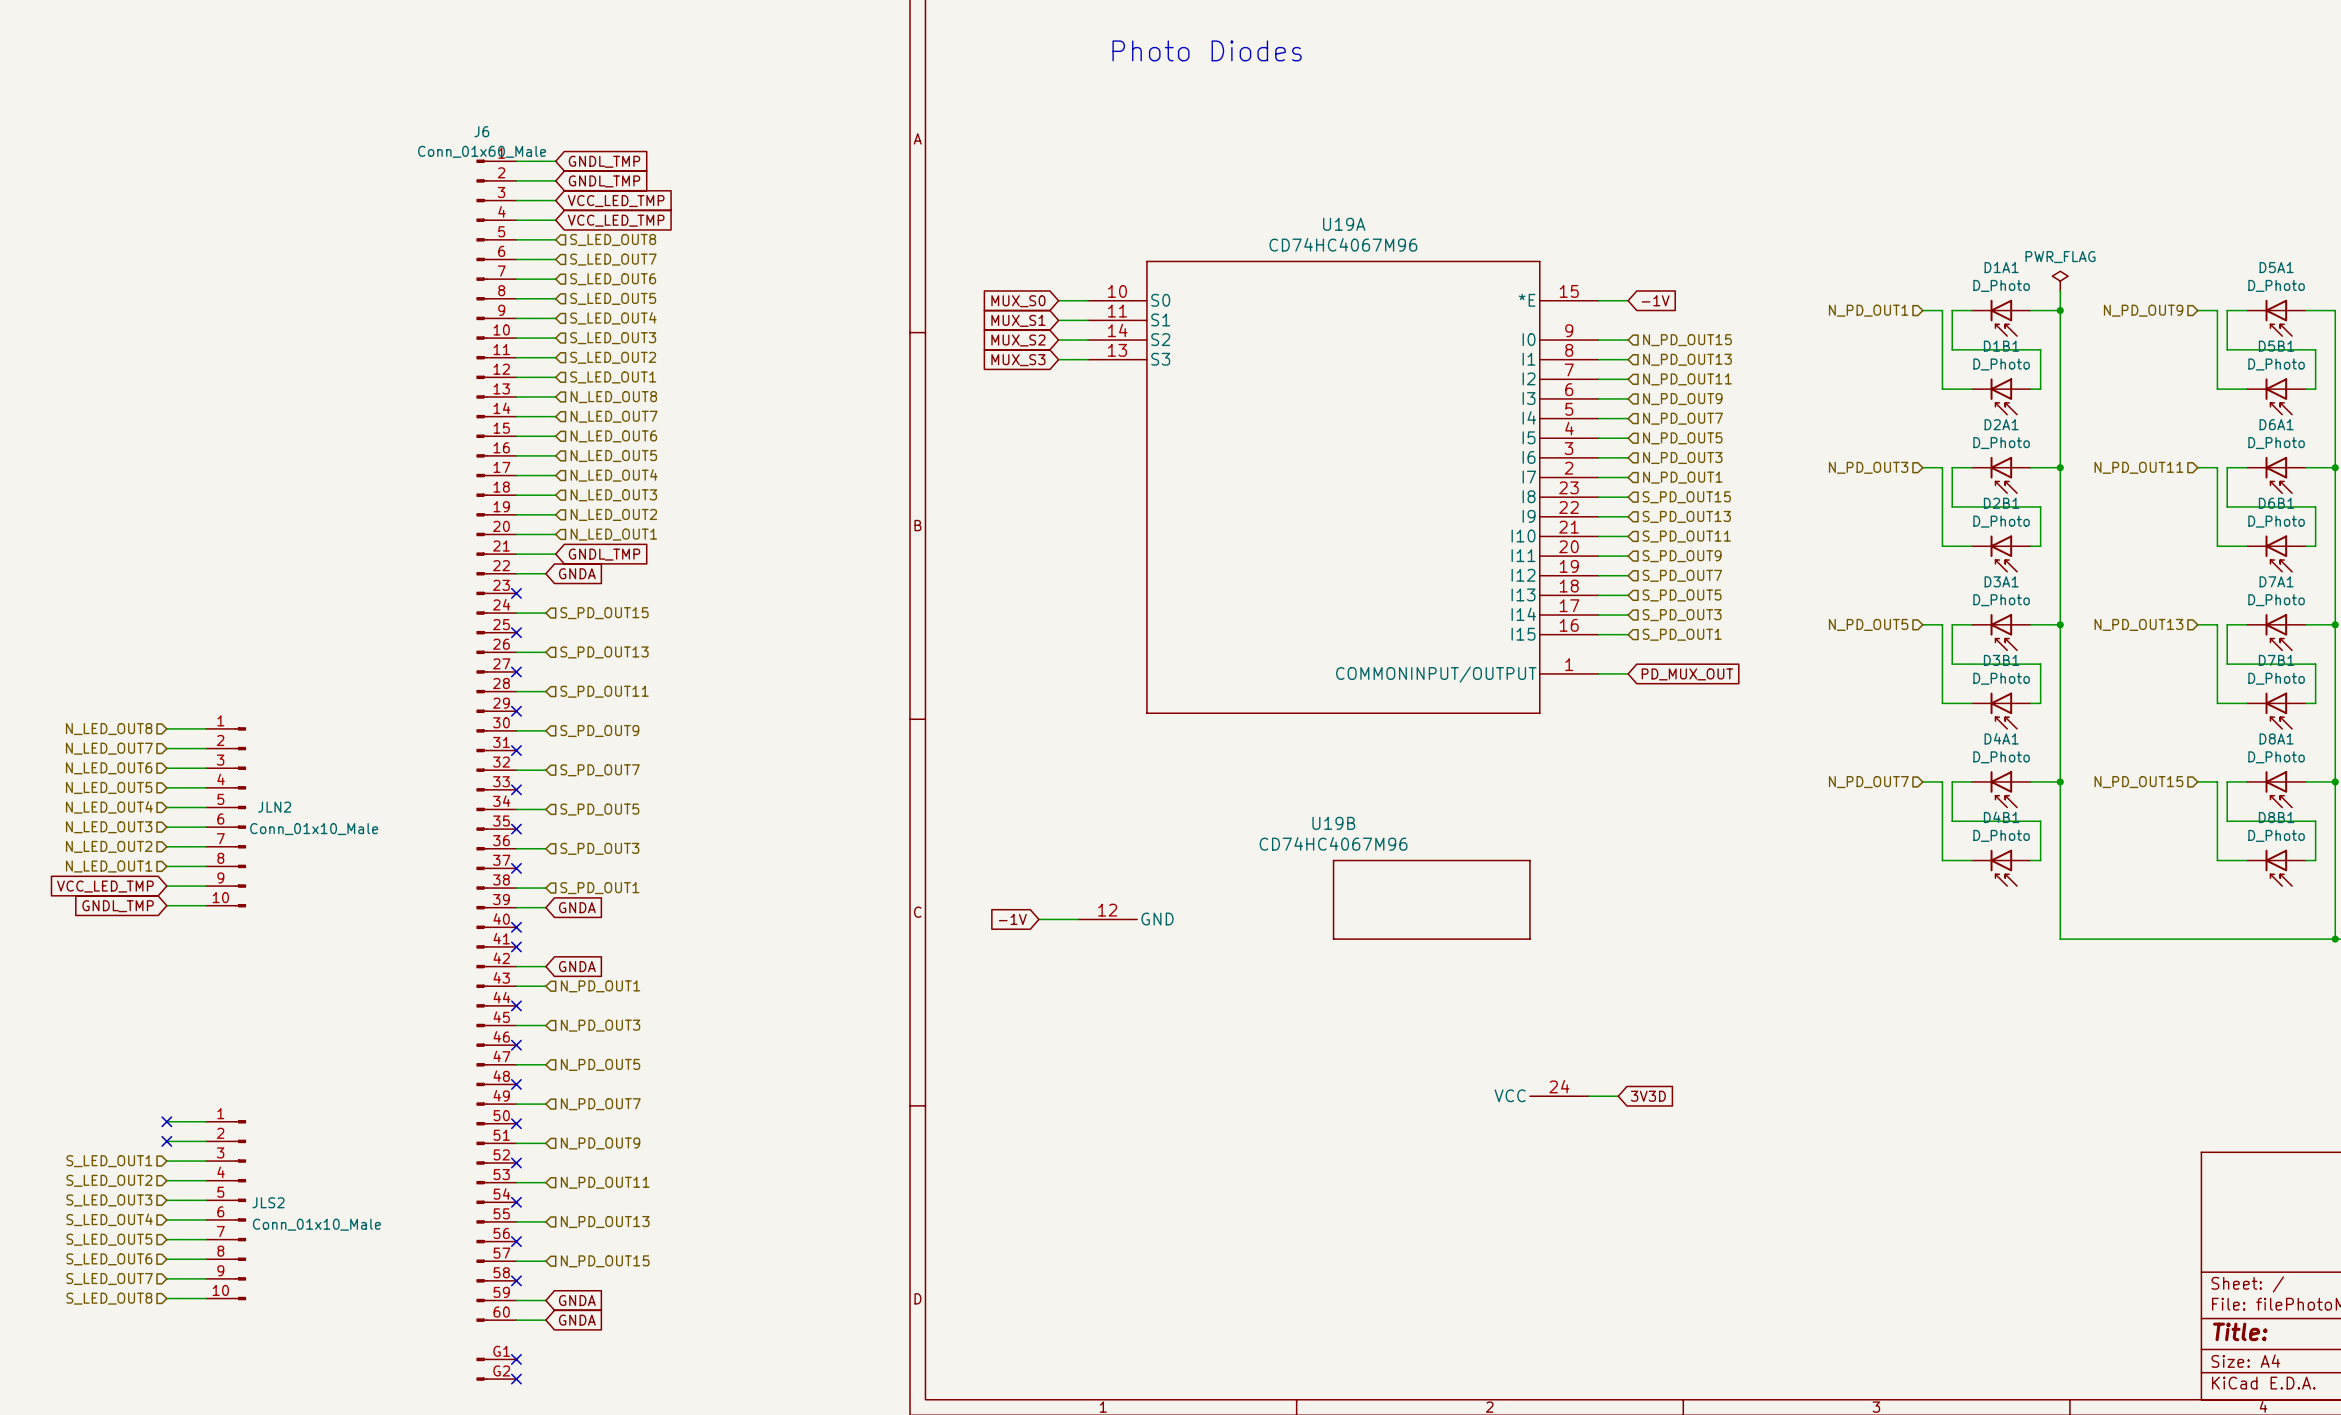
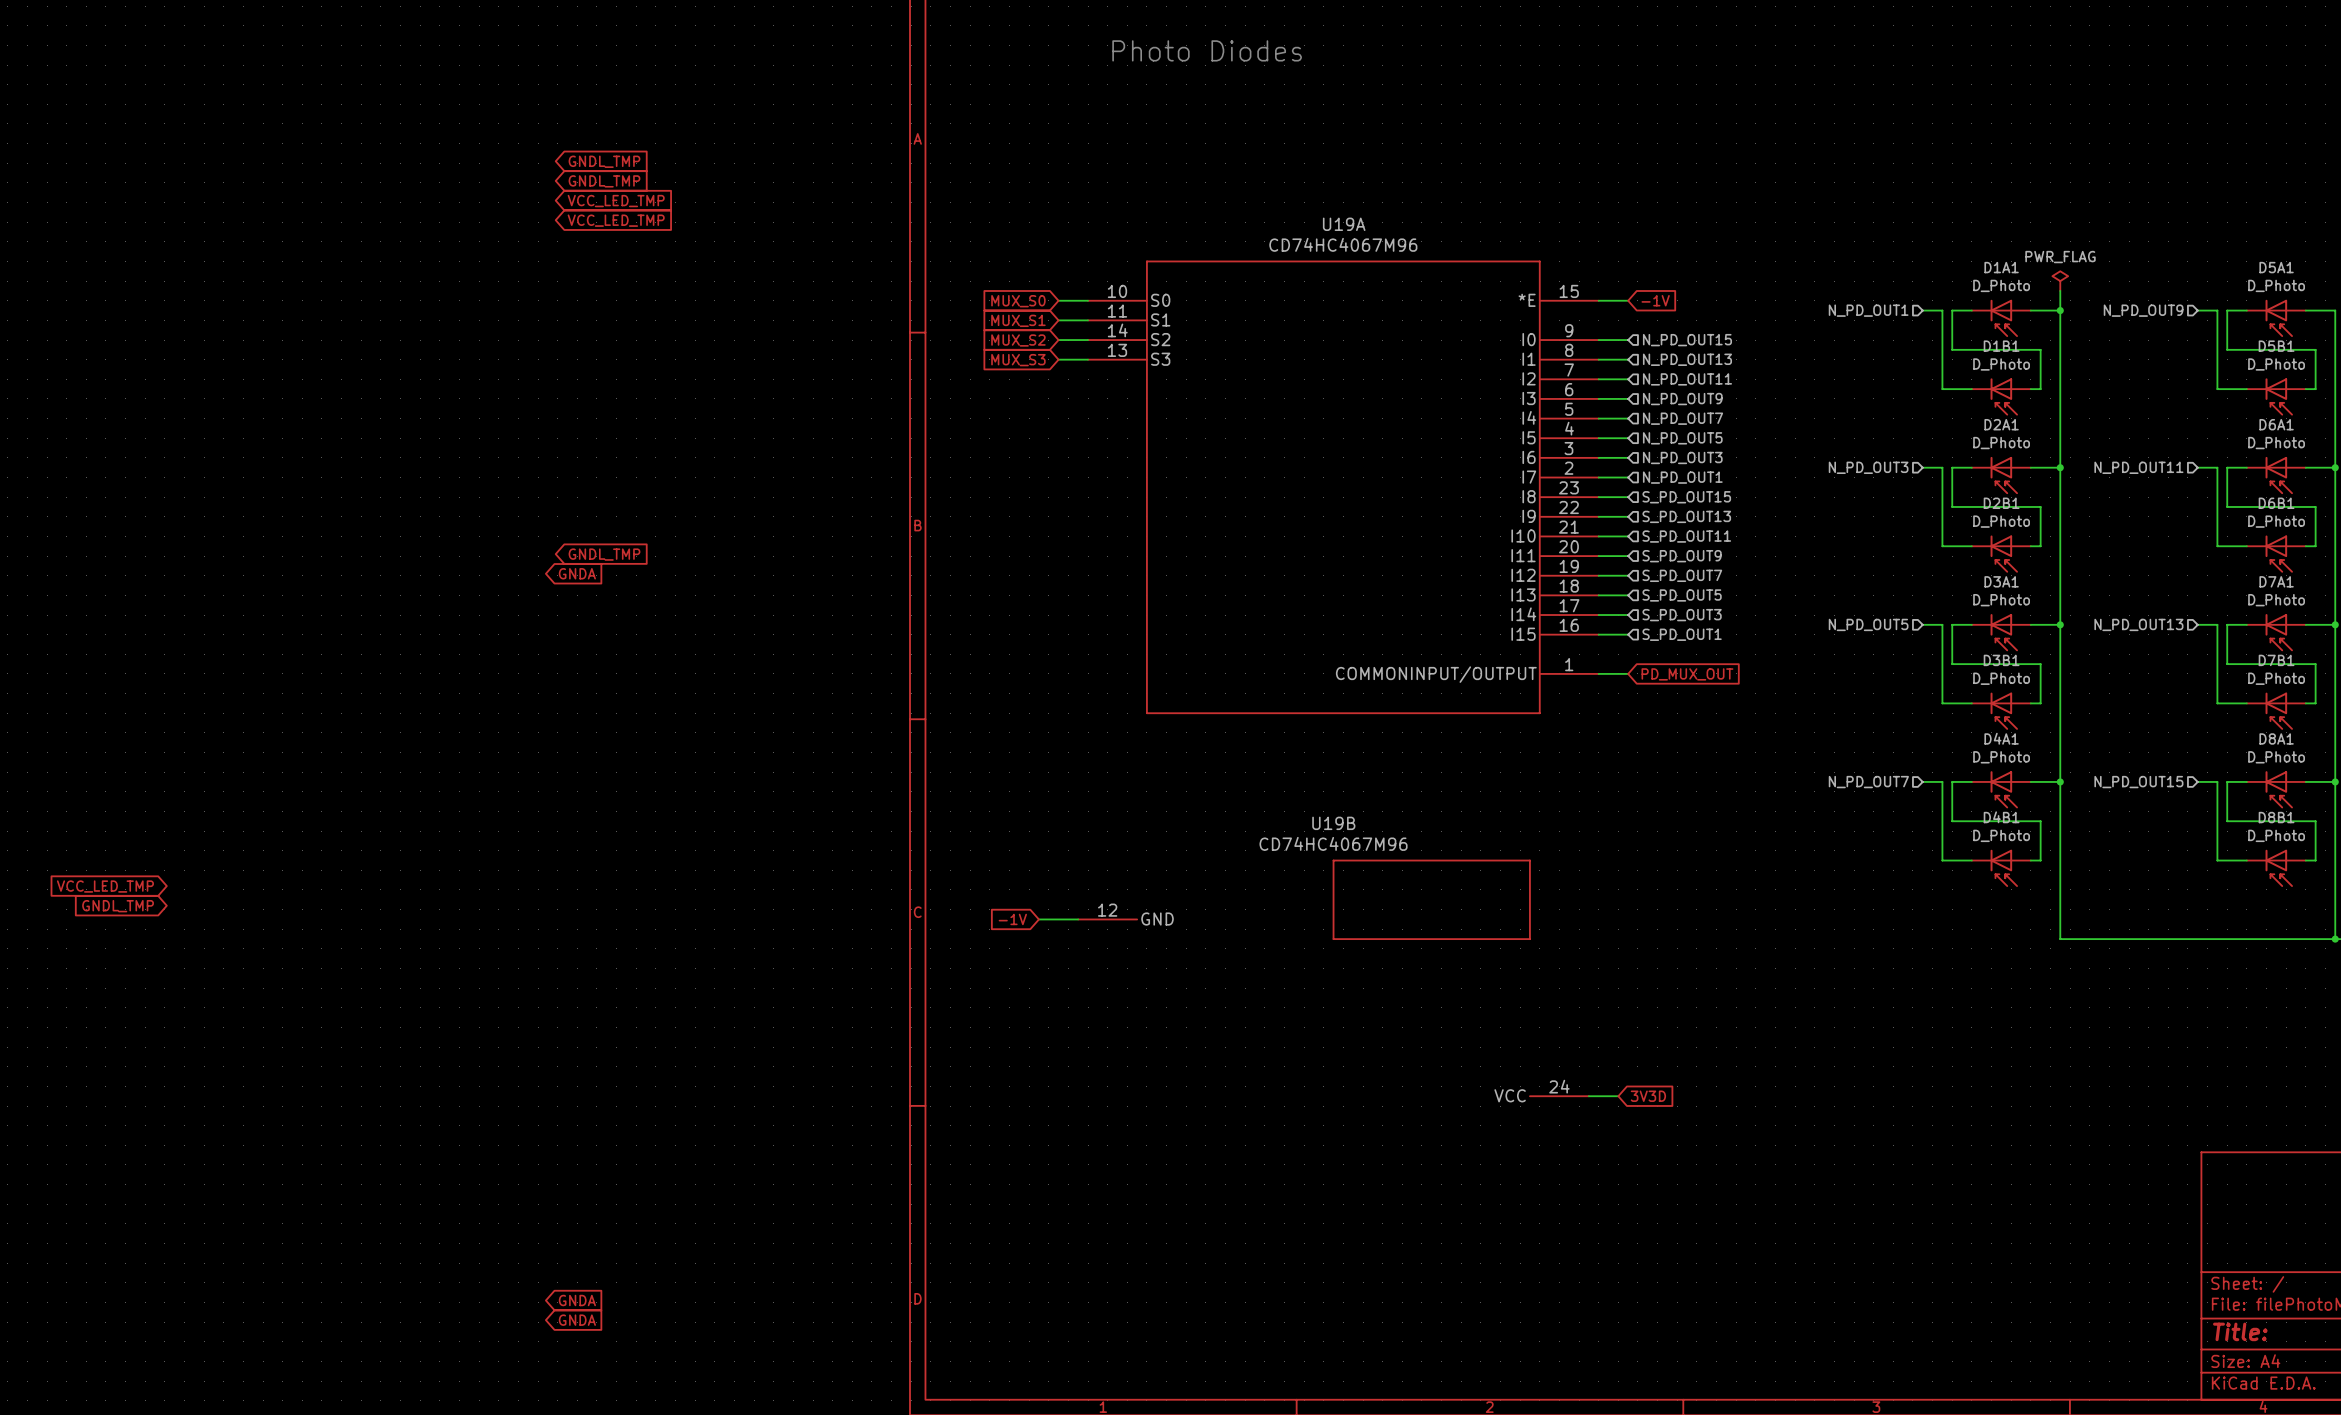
wire: (516, 161) (555, 161) -> none
wire: (516, 180) (555, 180) -> none
wire: (516, 200) (555, 200) -> none
wire: (516, 220) (555, 220) -> none
wire: (516, 239) (555, 239) -> none
hierarchical label: S_LED_OUT8 (613, 239) -> none
wire: (516, 259) (555, 259) -> none
hierarchical label: S_LED_OUT7 (613, 259) -> none
wire: (516, 279) (555, 279) -> none
hierarchical label: S_LED_OUT6 (613, 279) -> none
wire: (516, 298) (555, 298) -> none
hierarchical label: S_LED_OUT5 (613, 298) -> none
wire: (516, 318) (555, 318) -> none
hierarchical label: S_LED_OUT4 (613, 318) -> none
wire: (516, 338) (555, 338) -> none
hierarchical label: S_LED_OUT3 (613, 338) -> none
wire: (516, 357) (555, 357) -> none
hierarchical label: S_LED_OUT2 (613, 357) -> none
wire: (516, 377) (555, 377) -> none
hierarchical label: S_LED_OUT1 (613, 377) -> none
wire: (516, 396) (555, 396) -> none
hierarchical label: N_LED_OUT8 (613, 397) -> none
wire: (516, 416) (555, 416) -> none
hierarchical label: N_LED_OUT7 (614, 416) -> none
wire: (516, 436) (555, 436) -> none
hierarchical label: N_LED_OUT6 (613, 436) -> none
wire: (516, 455) (555, 455) -> none
hierarchical label: N_LED_OUT5 (613, 456) -> none
wire: (516, 475) (555, 475) -> none
hierarchical label: N_LED_OUT4 (614, 475) -> none
wire: (516, 495) (555, 495) -> none
hierarchical label: N_LED_OUT3 (613, 495) -> none
wire: (516, 514) (555, 514) -> none
hierarchical label: N_LED_OUT2 (613, 514) -> none
wire: (516, 534) (555, 534) -> none
hierarchical label: N_LED_OUT1 (613, 534) -> none
wire: (516, 554) (555, 554) -> none
wire: (516, 573) (545, 573) -> none
no-connect mark: (516, 593) -> none
wire: (516, 613) (545, 613) -> none
hierarchical label: S_PD_OUT15 (604, 613) -> none
no-connect mark: (516, 632) -> none
wire: (516, 652) (545, 652) -> none
hierarchical label: S_PD_OUT13 (604, 652) -> none
no-connect mark: (516, 671) -> none
wire: (516, 691) (545, 691) -> none
hierarchical label: S_PD_OUT11 (604, 691) -> none
no-connect mark: (516, 711) -> none
wire: (166, 728) (206, 728) -> none
hierarchical label: N_LED_OUT8 (109, 729) -> none
wire: (516, 730) (545, 730) -> none
hierarchical label: S_PD_OUT9 (599, 731) -> none
hierarchical label: N_LED_OUT7 (109, 748) -> none
wire: (166, 748) (206, 748) -> none
no-connect mark: (516, 750) -> none
hierarchical label: N_LED_OUT6 (109, 768) -> none
wire: (166, 768) (206, 768) -> none
J6: Conn_01x60_Male (496, 770) -> none
wire: (516, 770) (545, 770) -> none
hierarchical label: S_PD_OUT7 (600, 770) -> none
hierarchical label: N_LED_OUT5 (109, 787) -> none
wire: (166, 787) (206, 787) -> none
no-connect mark: (516, 789) -> none
hierarchical label: N_LED_OUT4 (109, 807) -> none
wire: (166, 807) (206, 807) -> none
wire: (516, 809) (545, 809) -> none
hierarchical label: S_PD_OUT5 (599, 809) -> none
JLN2: Conn_01x10_Male (226, 817) -> none
hierarchical label: N_LED_OUT3 (109, 827) -> none
wire: (166, 827) (206, 827) -> none
no-connect mark: (516, 829) -> none
hierarchical label: N_LED_OUT2 (109, 846) -> none
wire: (166, 846) (206, 846) -> none
wire: (516, 848) (545, 848) -> none
hierarchical label: S_PD_OUT3 (599, 848) -> none
hierarchical label: N_LED_OUT1 (109, 866) -> none
wire: (166, 866) (206, 866) -> none
no-connect mark: (516, 868) -> none
wire: (166, 886) (206, 886) -> none
wire: (516, 888) (545, 888) -> none
hierarchical label: S_PD_OUT1 (599, 888) -> none
wire: (166, 905) (206, 905) -> none
wire: (516, 907) (545, 907) -> none
global label: GNDA (577, 907) -> none
no-connect mark: (516, 927) -> none
no-connect mark: (516, 946) -> none
wire: (516, 966) (545, 966) -> none
global label: GNDA (577, 966) -> none
wire: (516, 986) (545, 986) -> none
hierarchical label: N_PD_OUT1 (600, 986) -> none
no-connect mark: (516, 1005) -> none
wire: (516, 1025) (545, 1025) -> none
hierarchical label: N_PD_OUT3 (600, 1025) -> none
no-connect mark: (516, 1045) -> none
wire: (516, 1064) (545, 1064) -> none
hierarchical label: N_PD_OUT5 (600, 1064) -> none
no-connect mark: (516, 1084) -> none
wire: (516, 1104) (545, 1104) -> none
hierarchical label: N_PD_OUT7 (600, 1104) -> none
wire: (166, 1121) (206, 1121) -> none
no-connect mark: (166, 1121) -> none
no-connect mark: (516, 1123) -> none
wire: (166, 1141) (206, 1141) -> none
no-connect mark: (166, 1141) -> none
wire: (516, 1143) (545, 1143) -> none
hierarchical label: N_PD_OUT9 (600, 1143) -> none
hierarchical label: S_LED_OUT1 (109, 1161) -> none
wire: (166, 1161) (206, 1161) -> none
no-connect mark: (516, 1163) -> none
hierarchical label: S_LED_OUT2 (109, 1180) -> none
wire: (166, 1180) (206, 1180) -> none
wire: (516, 1182) (545, 1182) -> none
hierarchical label: N_PD_OUT11 (605, 1182) -> none
hierarchical label: S_LED_OUT3 (109, 1200) -> none
wire: (166, 1200) (206, 1200) -> none
no-connect mark: (516, 1202) -> none
JLS2: Conn_01x10_Male (226, 1210) -> none
hierarchical label: S_LED_OUT4 (109, 1219) -> none
wire: (166, 1219) (206, 1219) -> none
wire: (516, 1221) (545, 1221) -> none
hierarchical label: N_PD_OUT13 (605, 1222) -> none
hierarchical label: S_LED_OUT5 (109, 1239) -> none
wire: (166, 1239) (206, 1239) -> none
no-connect mark: (516, 1241) -> none
hierarchical label: S_LED_OUT6 (109, 1259) -> none
wire: (166, 1259) (206, 1259) -> none
wire: (516, 1261) (545, 1261) -> none
hierarchical label: N_PD_OUT15 (605, 1261) -> none
wire: (166, 1278) (206, 1278) -> none
hierarchical label: S_LED_OUT7 (109, 1279) -> none
no-connect mark: (516, 1280) -> none
hierarchical label: S_LED_OUT8 (109, 1298) -> none
wire: (166, 1298) (206, 1298) -> none
wire: (516, 1300) (545, 1300) -> none
wire: (516, 1320) (545, 1320) -> none
no-connect mark: (516, 1359) -> none
no-connect mark: (516, 1379) -> none

